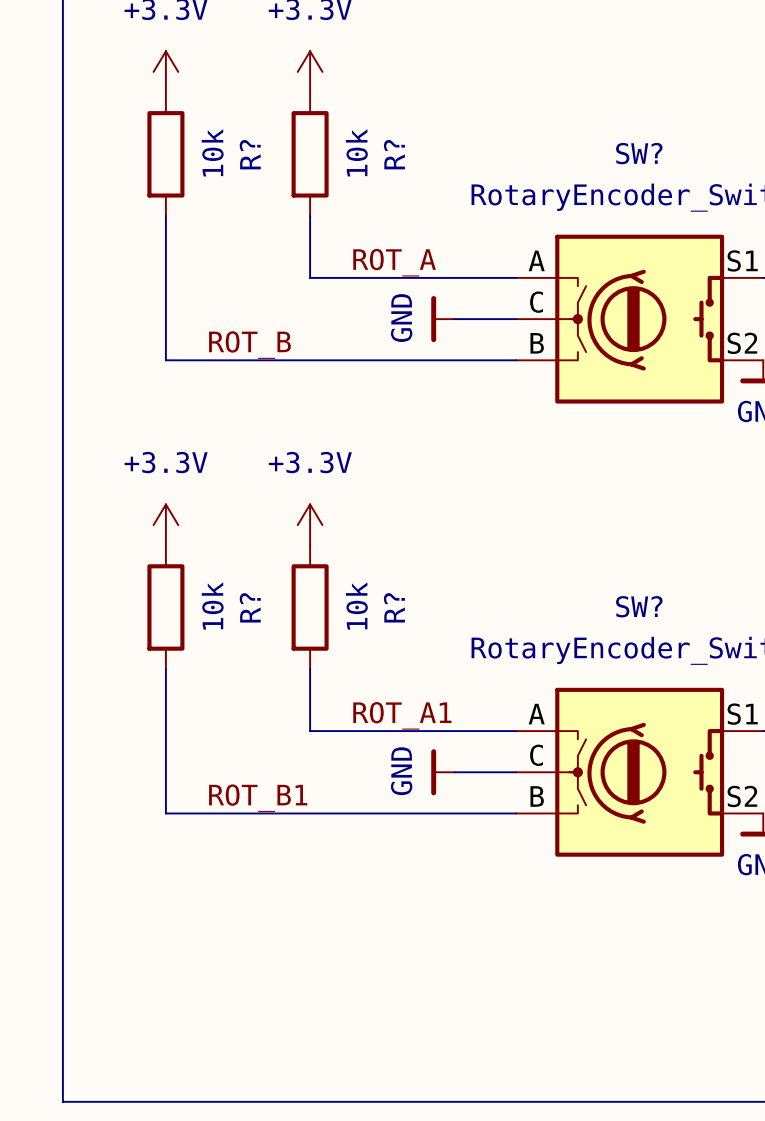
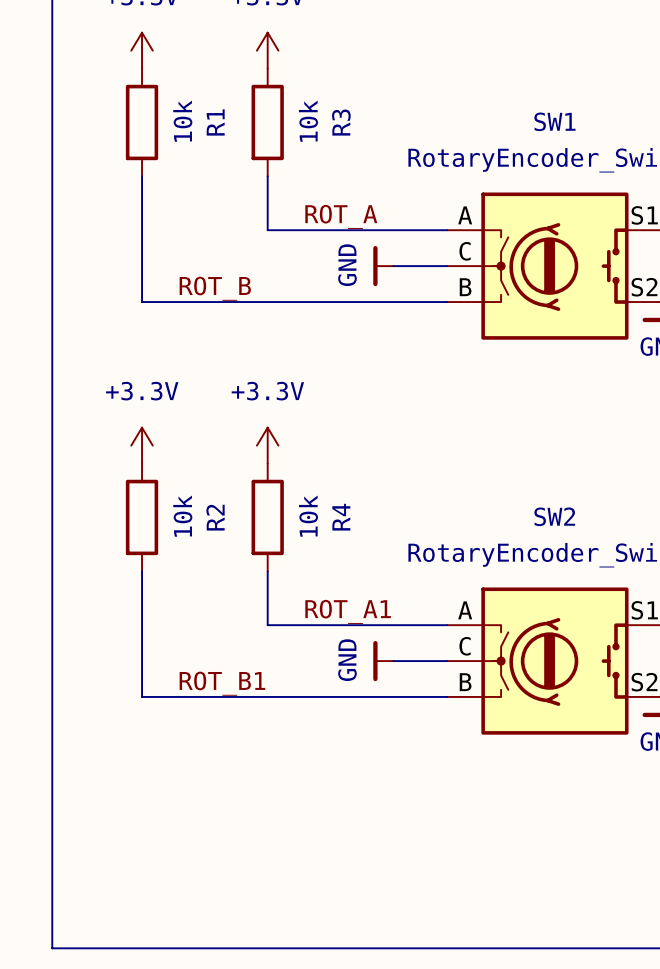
SW? name: SW? (639, 153) -> SW1 (554, 121)
R? name: R? (250, 154) -> R1 (215, 122)
R? name: R? (394, 154) -> R3 (341, 122)
SW? name: SW? (639, 606) -> SW2 (554, 516)
R? name: R? (250, 607) -> R2 (215, 517)
R? name: R? (394, 607) -> R4 (341, 517)

